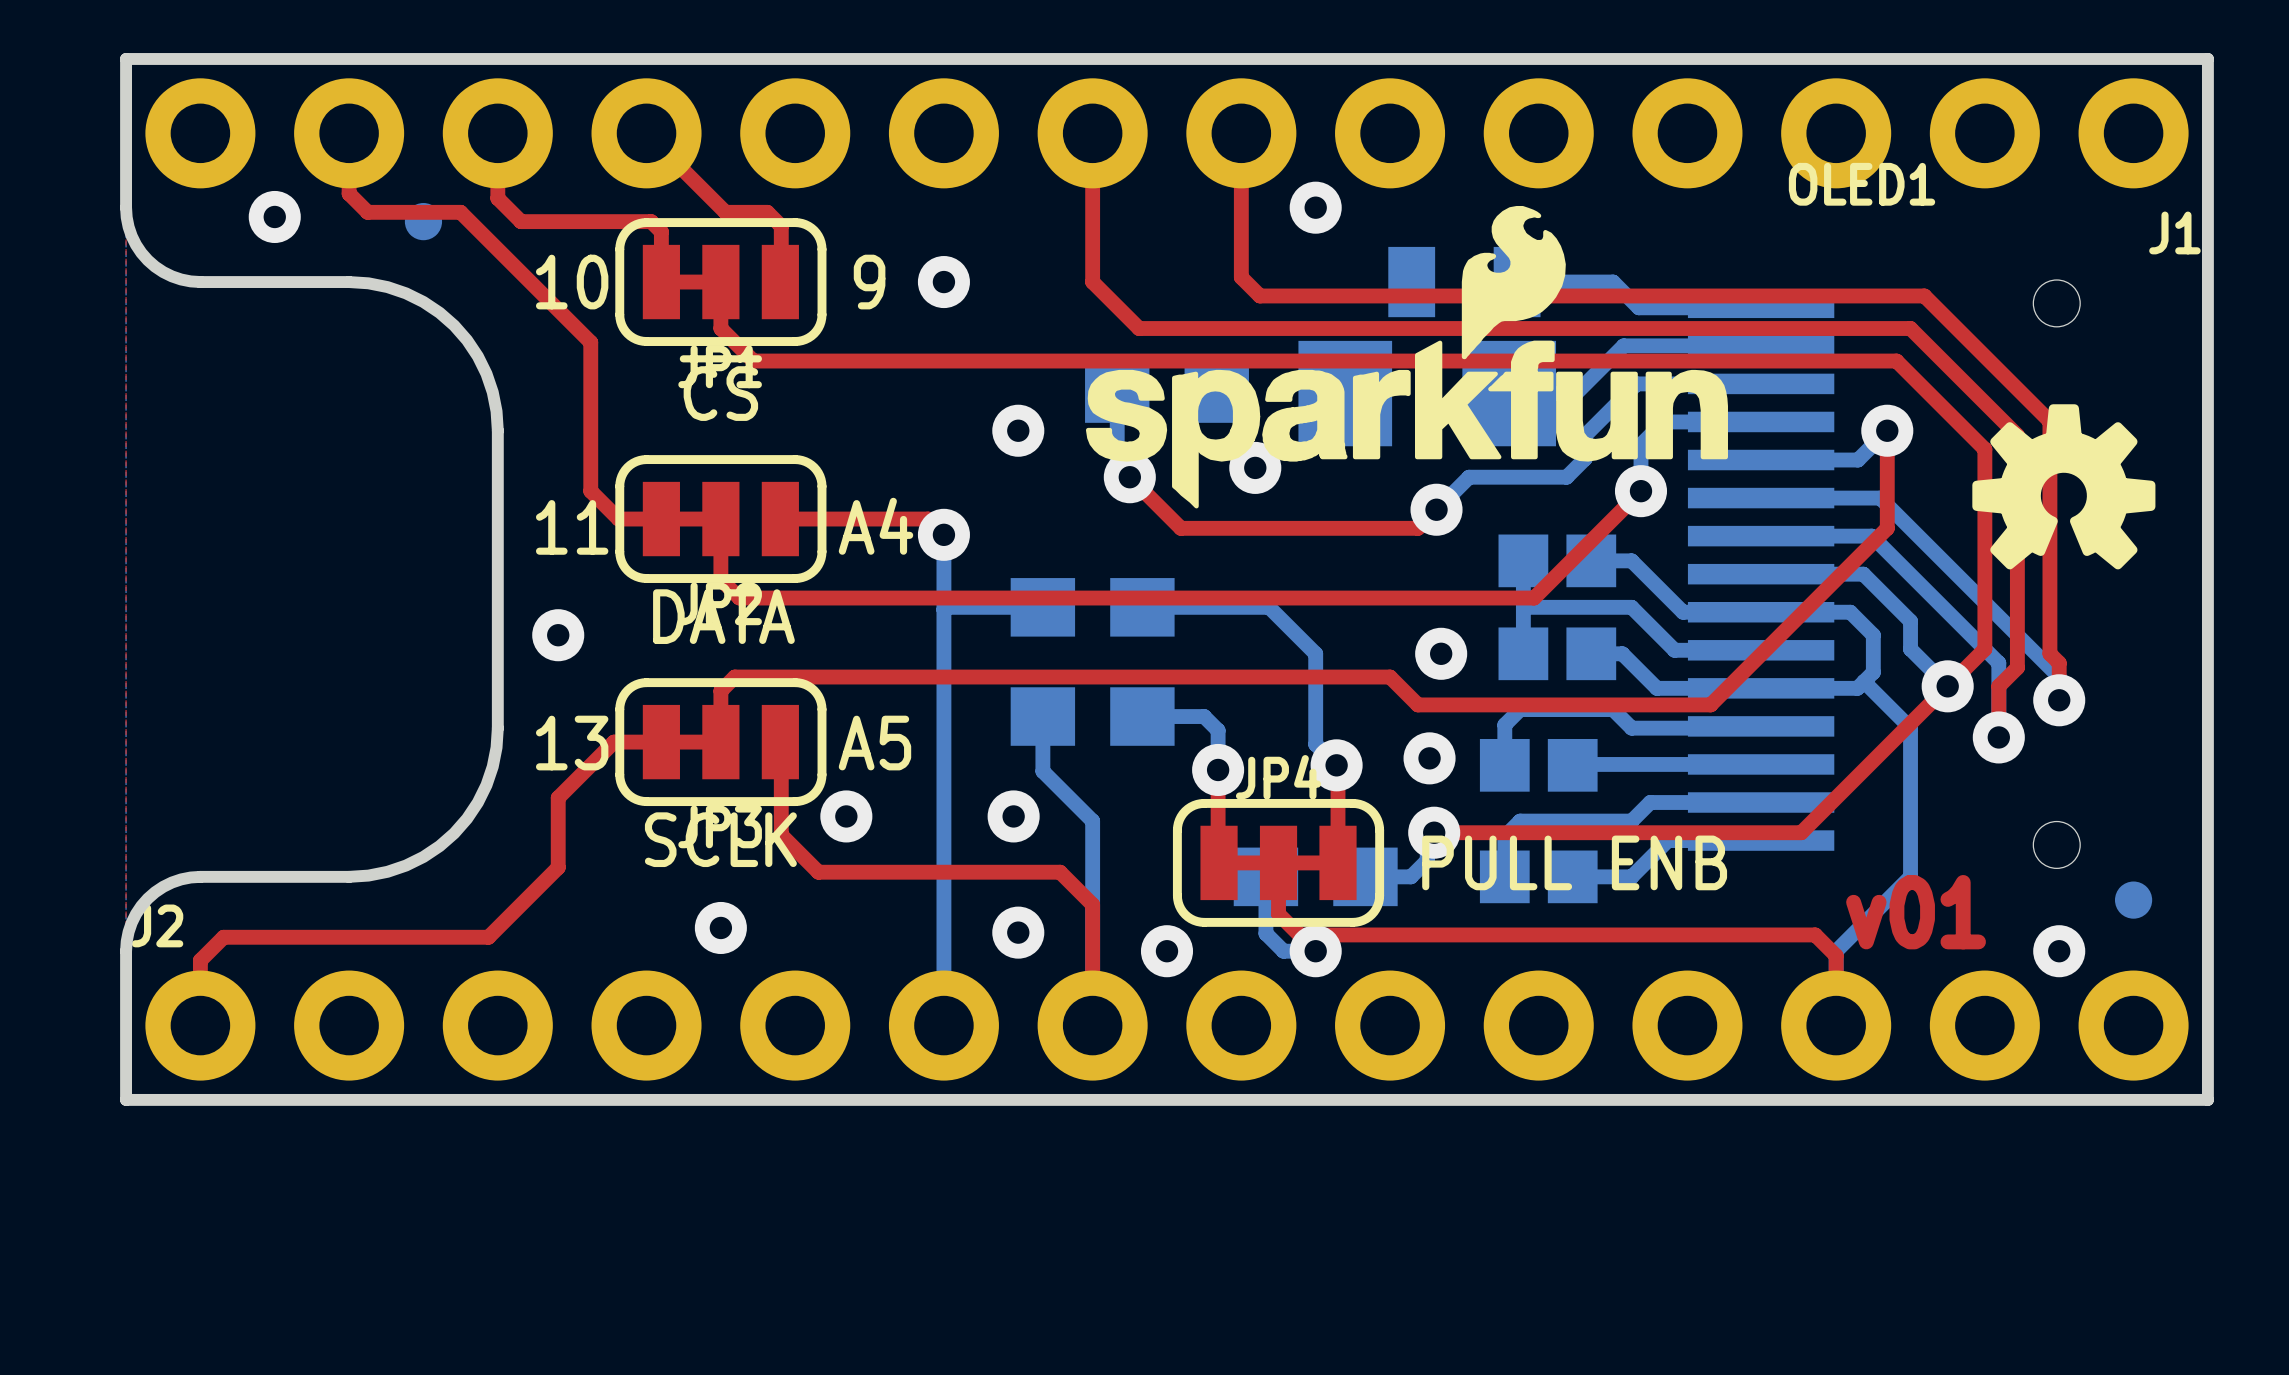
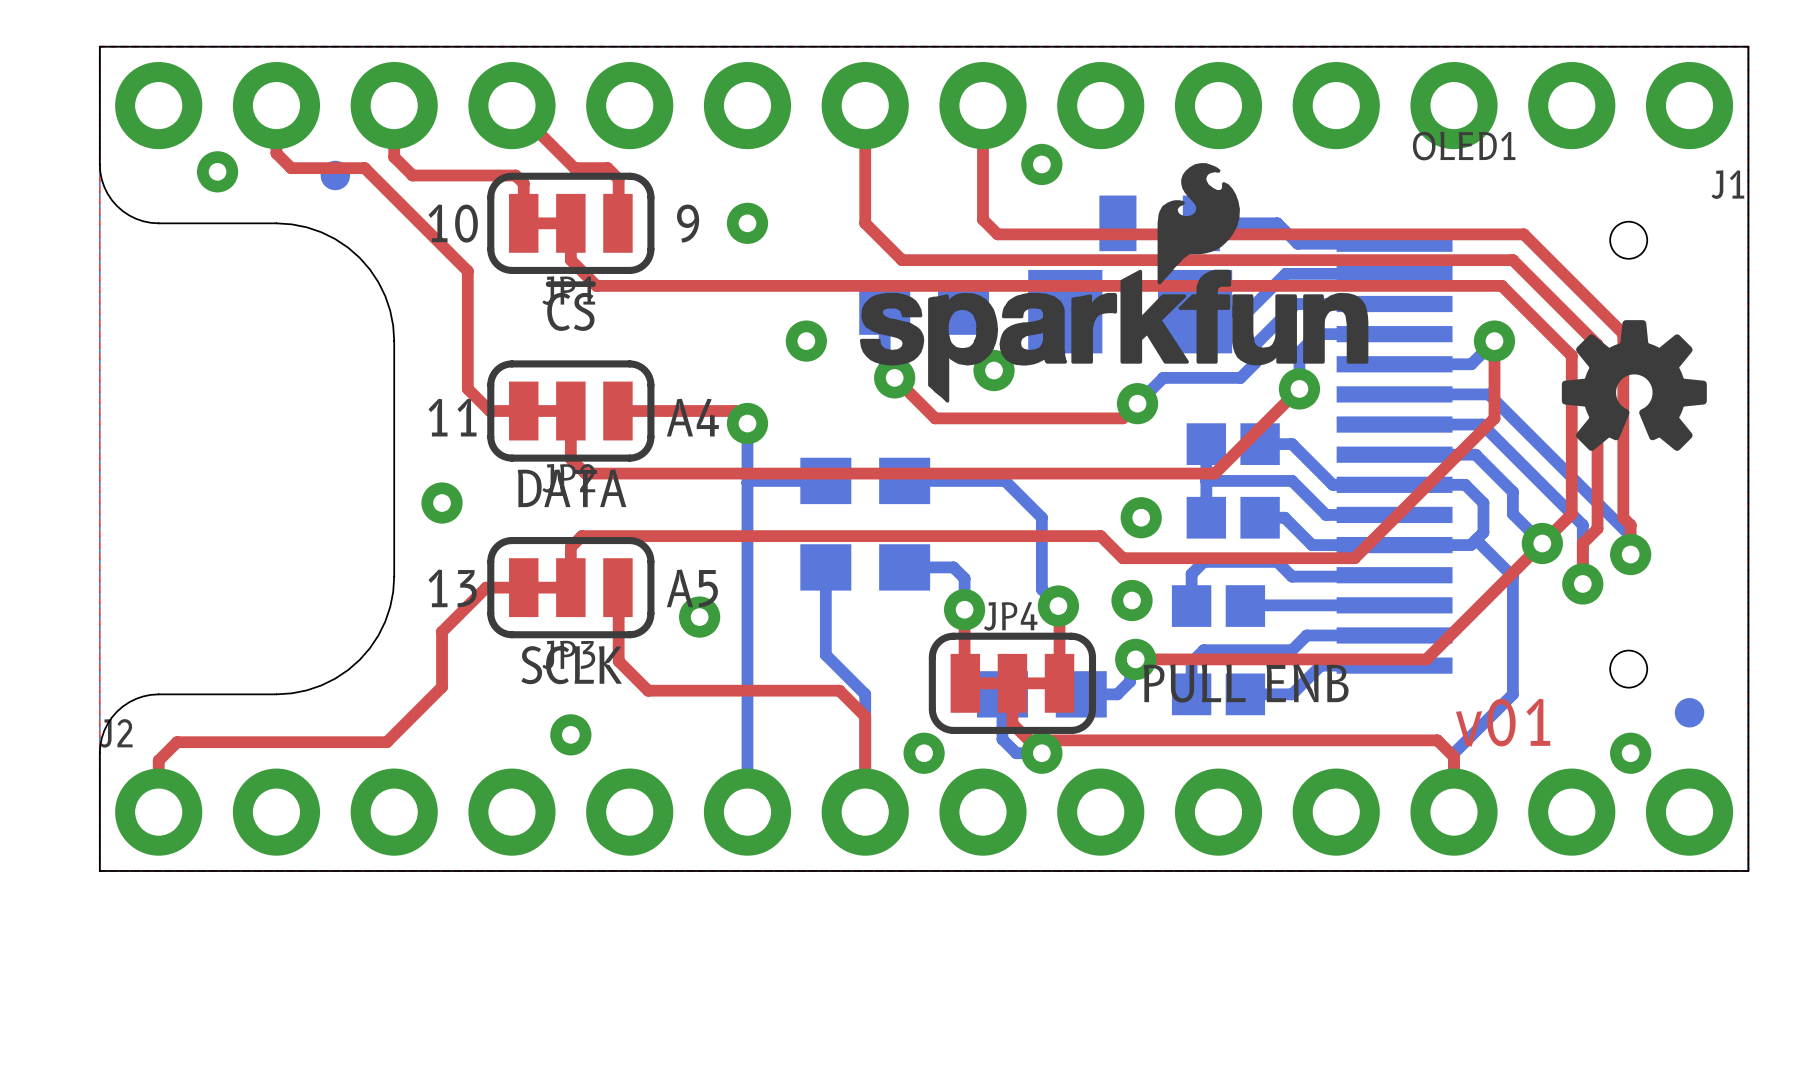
board edge width: thick (126, 58) (2207, 58) (2207, 1099) (126, 1099) (126, 941) (136, 914) (147, 898) (163, 886) (190, 877) (349, 876) (387, 871) (406, 865) (439, 846) (467, 818) (486, 785) (492, 766) (497, 728) (497, 430) (492, 392) (477, 356) (454, 325) (439, 312) (406, 293) (387, 287) (349, 282) (190, 281) (171, 276) (155, 266) (136, 244) (126, 217) (126, 58) -> thin (99, 46) (1748, 46) (1748, 870) (99, 870) (100, 745) (107, 723) (117, 711) (129, 702) (151, 694) (276, 694) (306, 690) (321, 685) (348, 670) (369, 648) (385, 621) (390, 607) (394, 576) (394, 341) (390, 310) (378, 282) (359, 257) (348, 247) (321, 232) (306, 227) (276, 223) (151, 222) (136, 218) (122, 211) (107, 193) (100, 172) (99, 46)
bottom track: (1042, 771) (1092, 821) (1092, 876) -> (825, 610) (825, 654) (865, 694)
via position: (846, 816) -> (699, 617)
via: (1013, 816) -> none
via: (1018, 932) -> none

